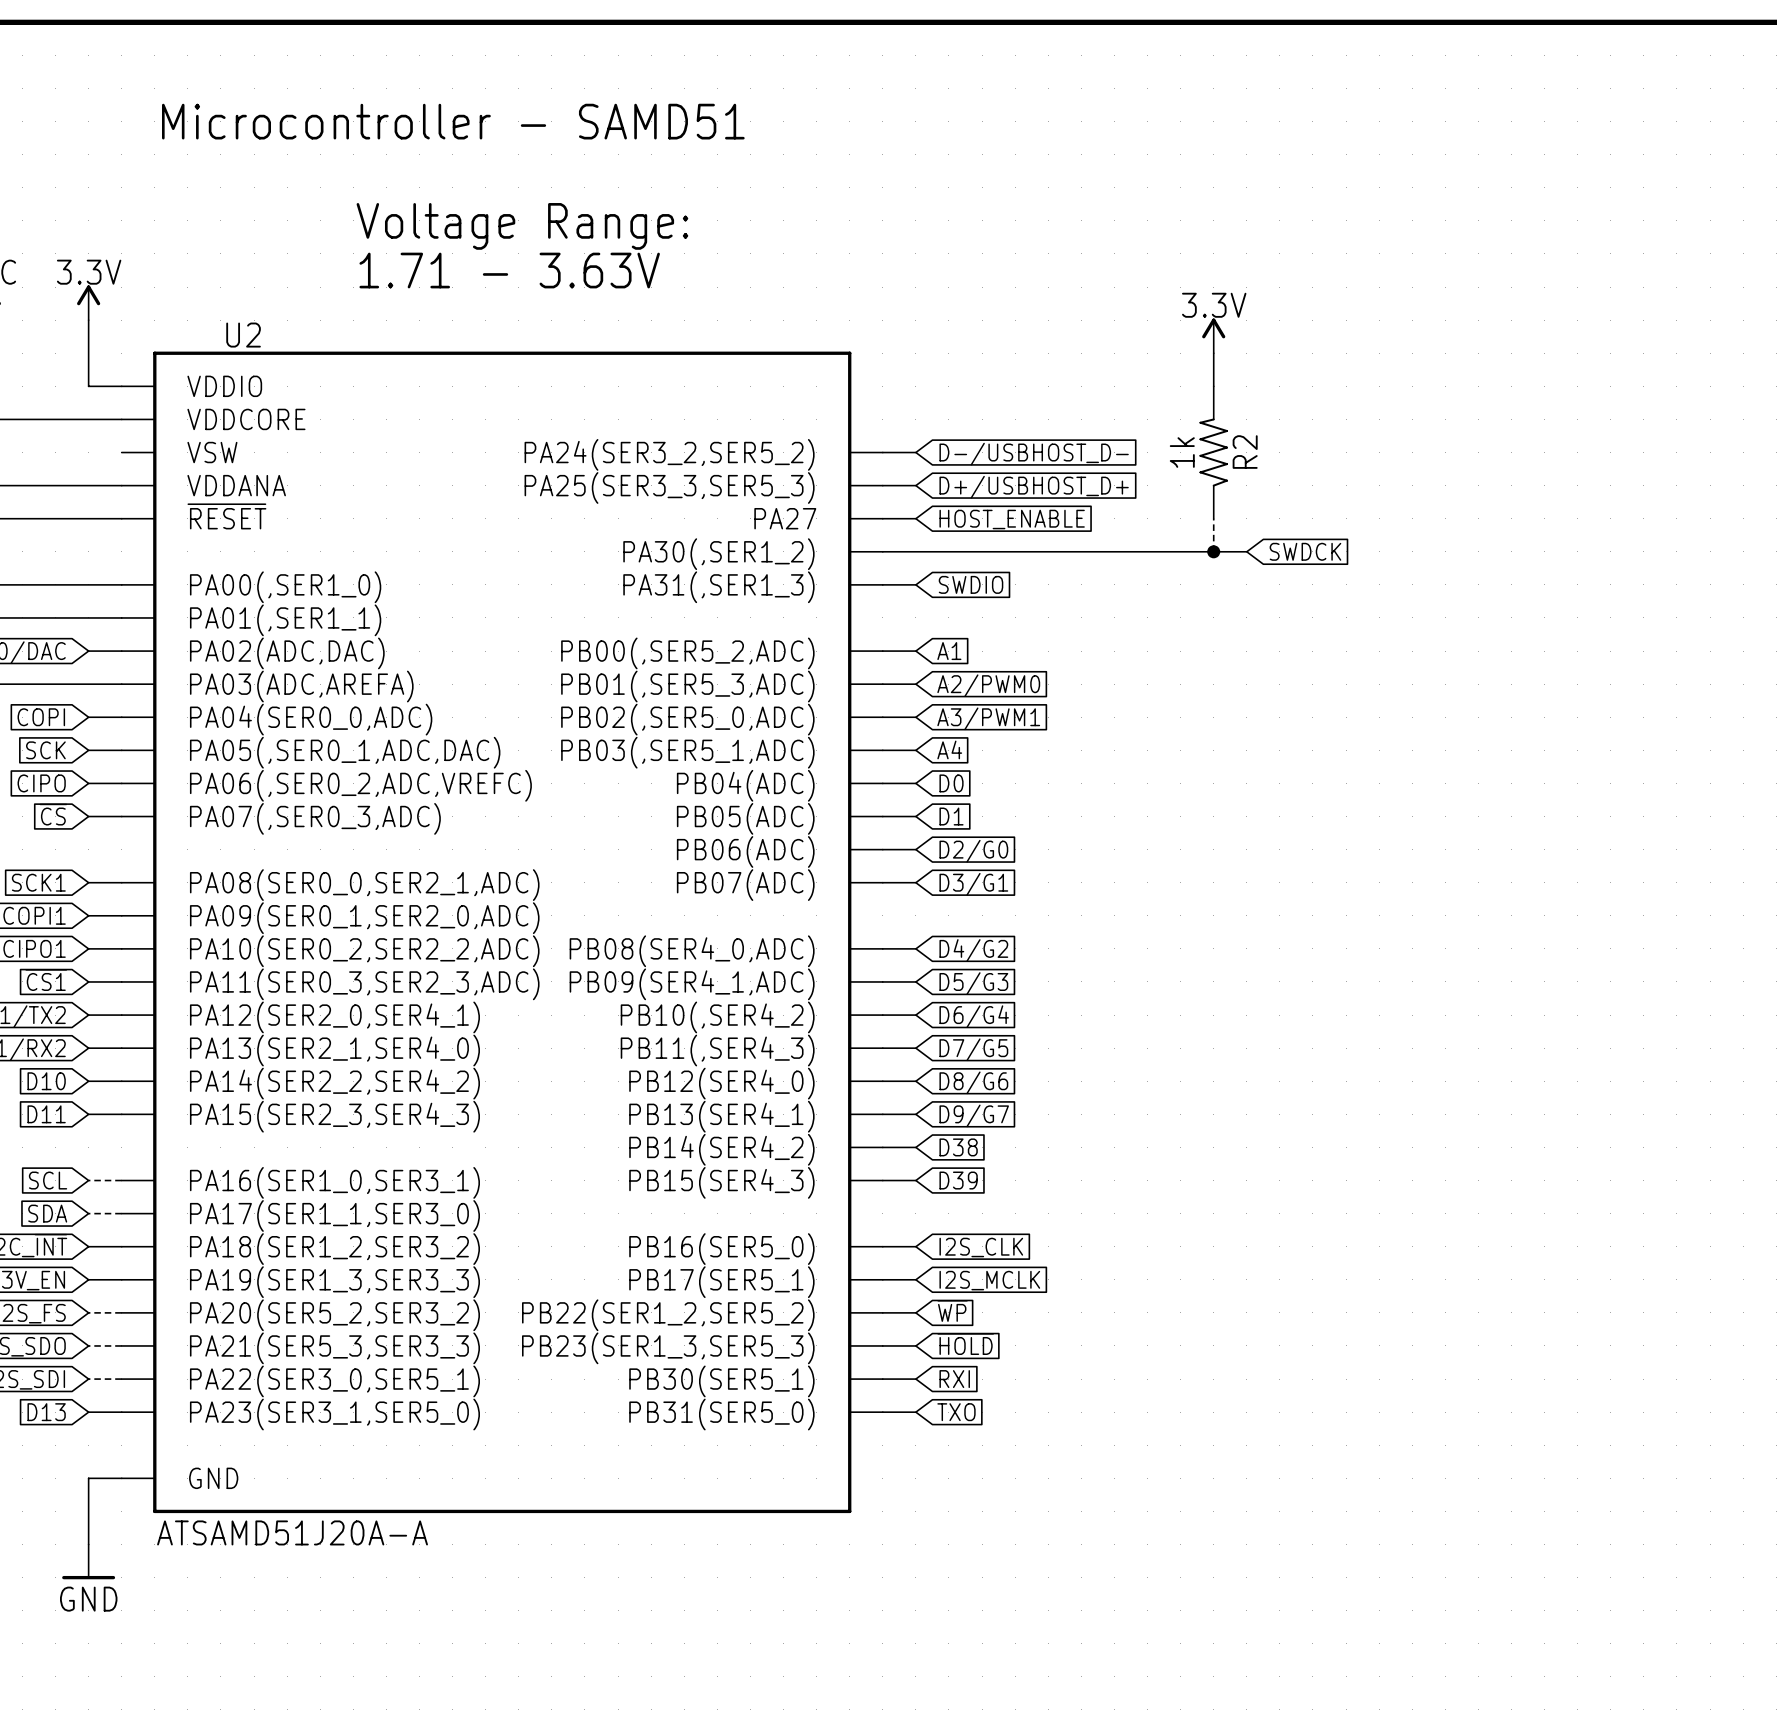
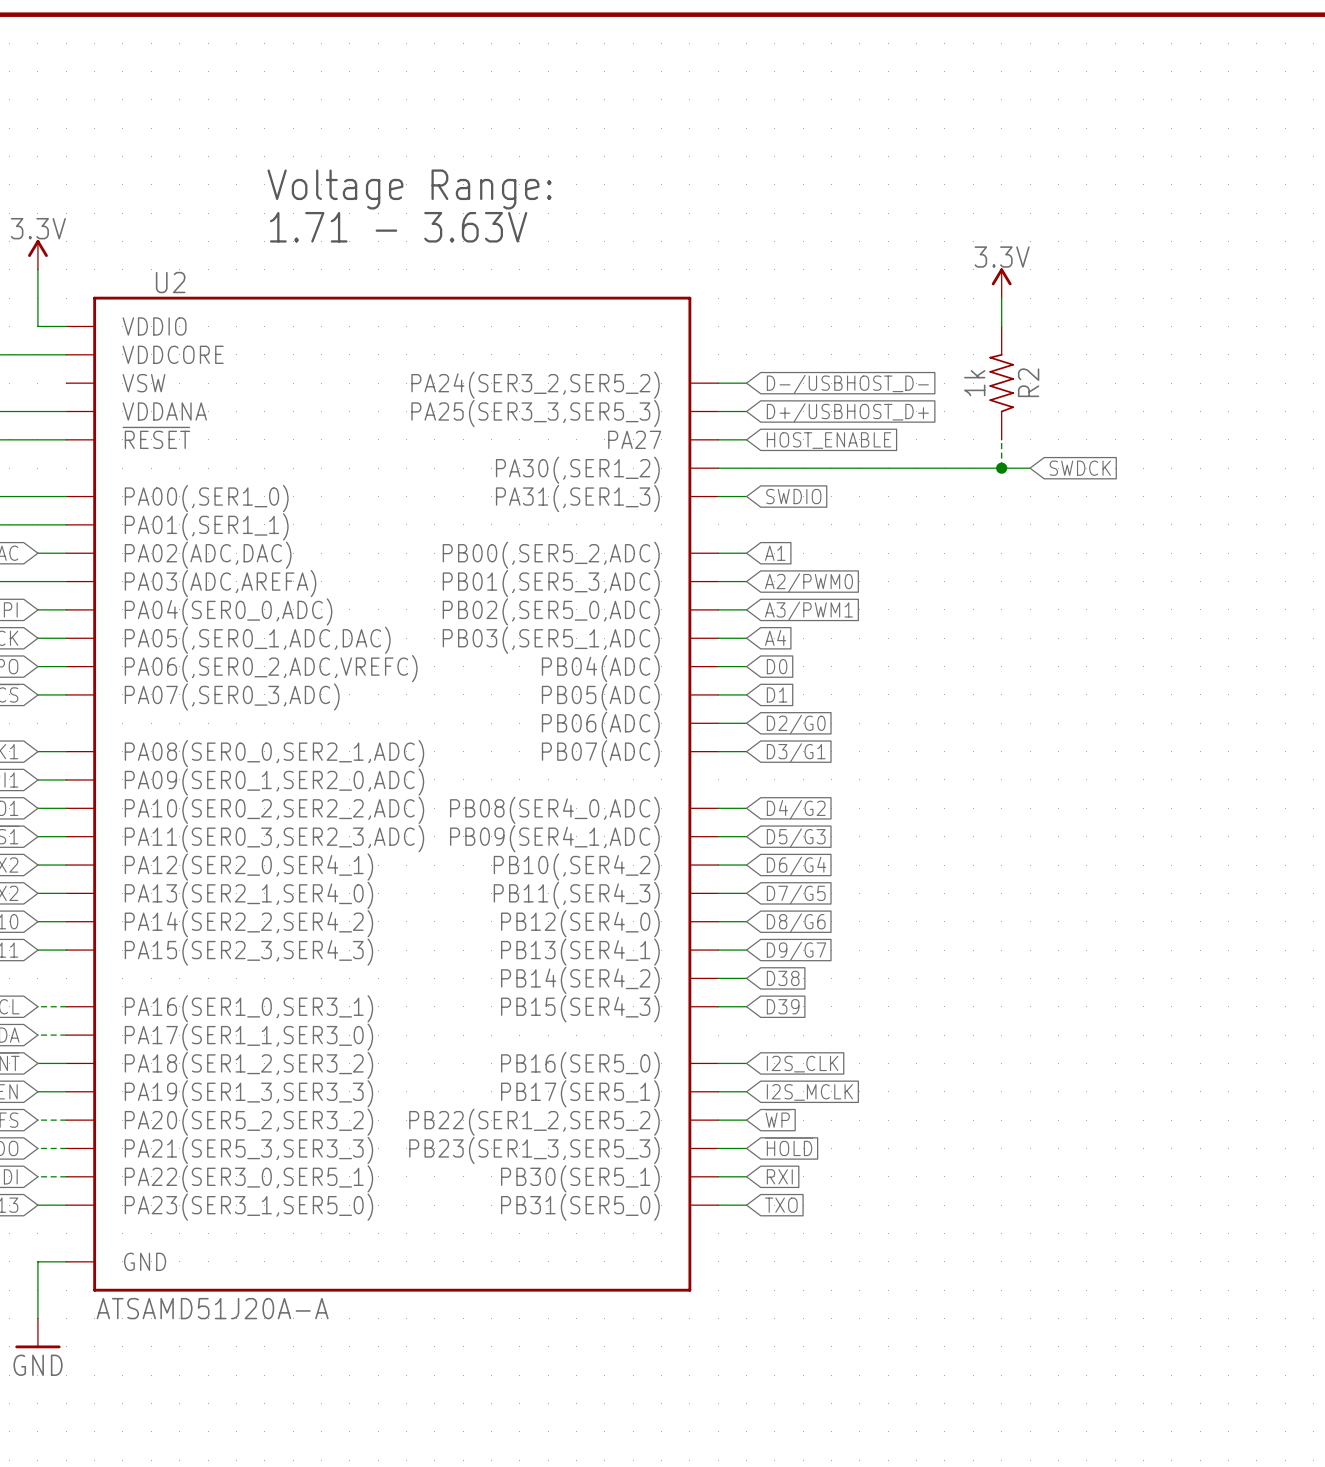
text: Microcontroller - SAMD51 (453, 121) -> none

